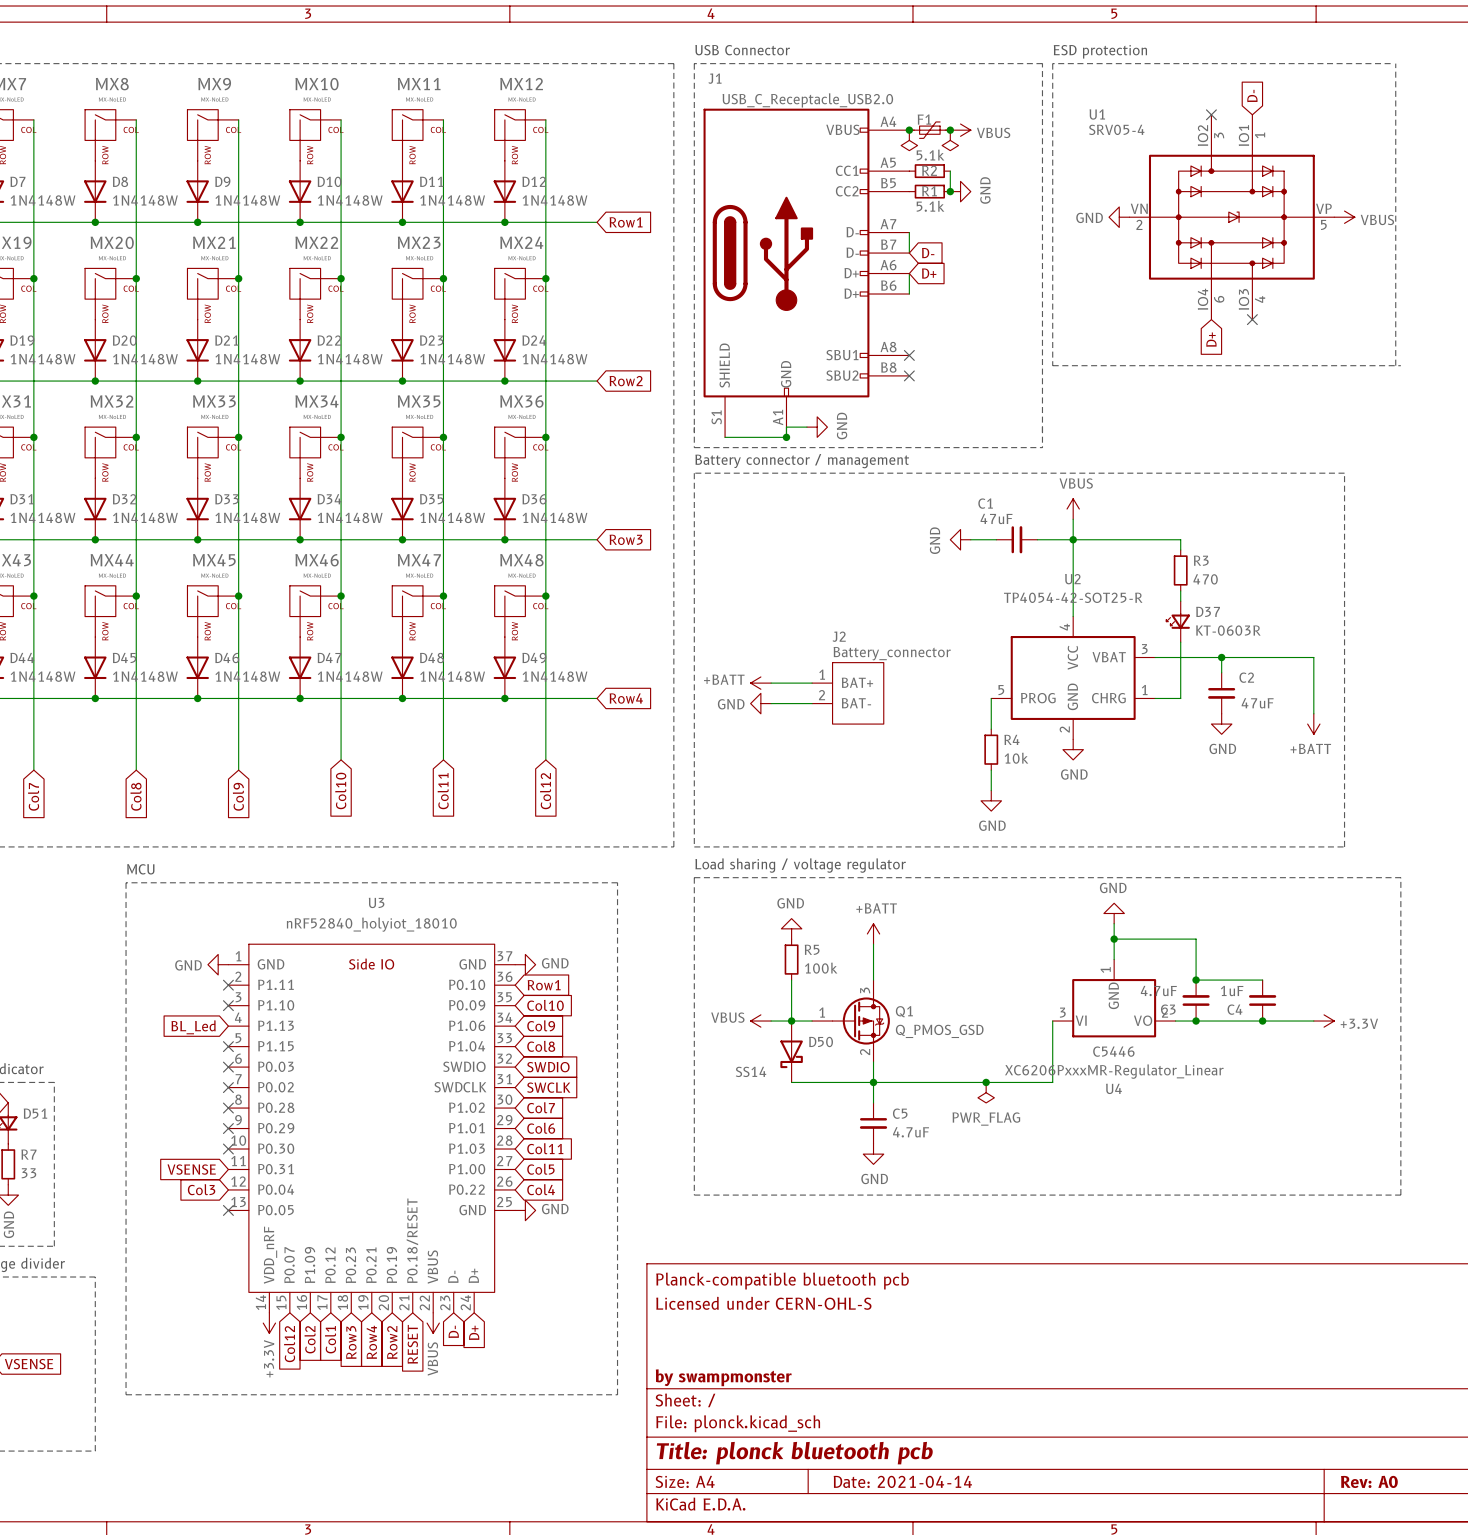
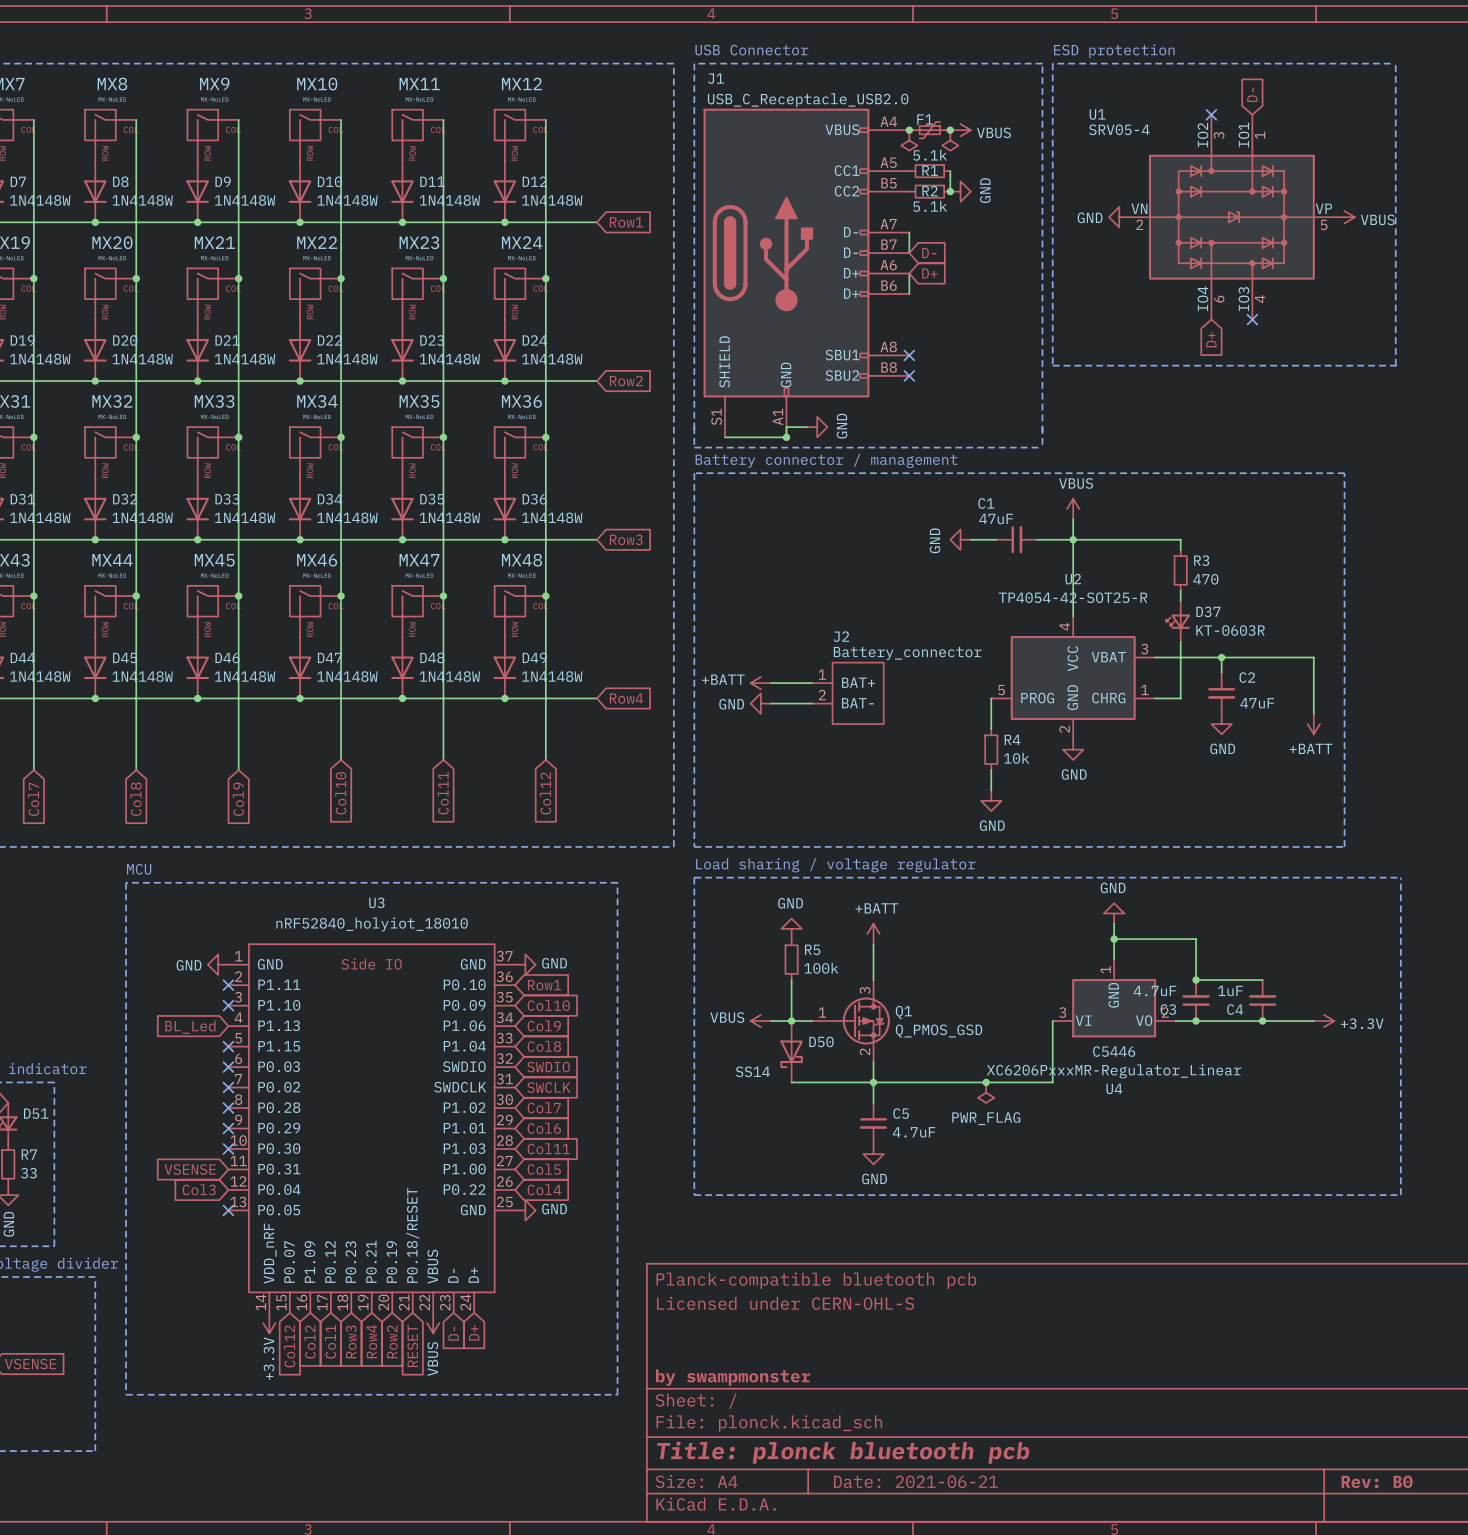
R2 name: R2 (929, 170) -> R1 (930, 170)
R1 name: R1 (929, 191) -> R2 (930, 191)
title block: Date: 2021-04-14 (902, 1481) -> Date: 2021-06-21 (915, 1481)
title block: Rev: A0 (1369, 1481) -> Rev: B0 (1377, 1481)

